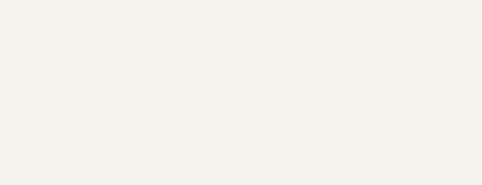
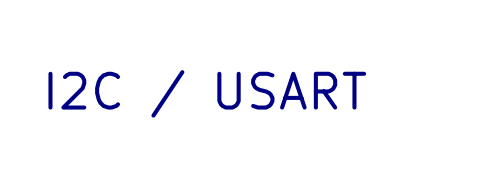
text: none -> I2C / USART (207, 93)

